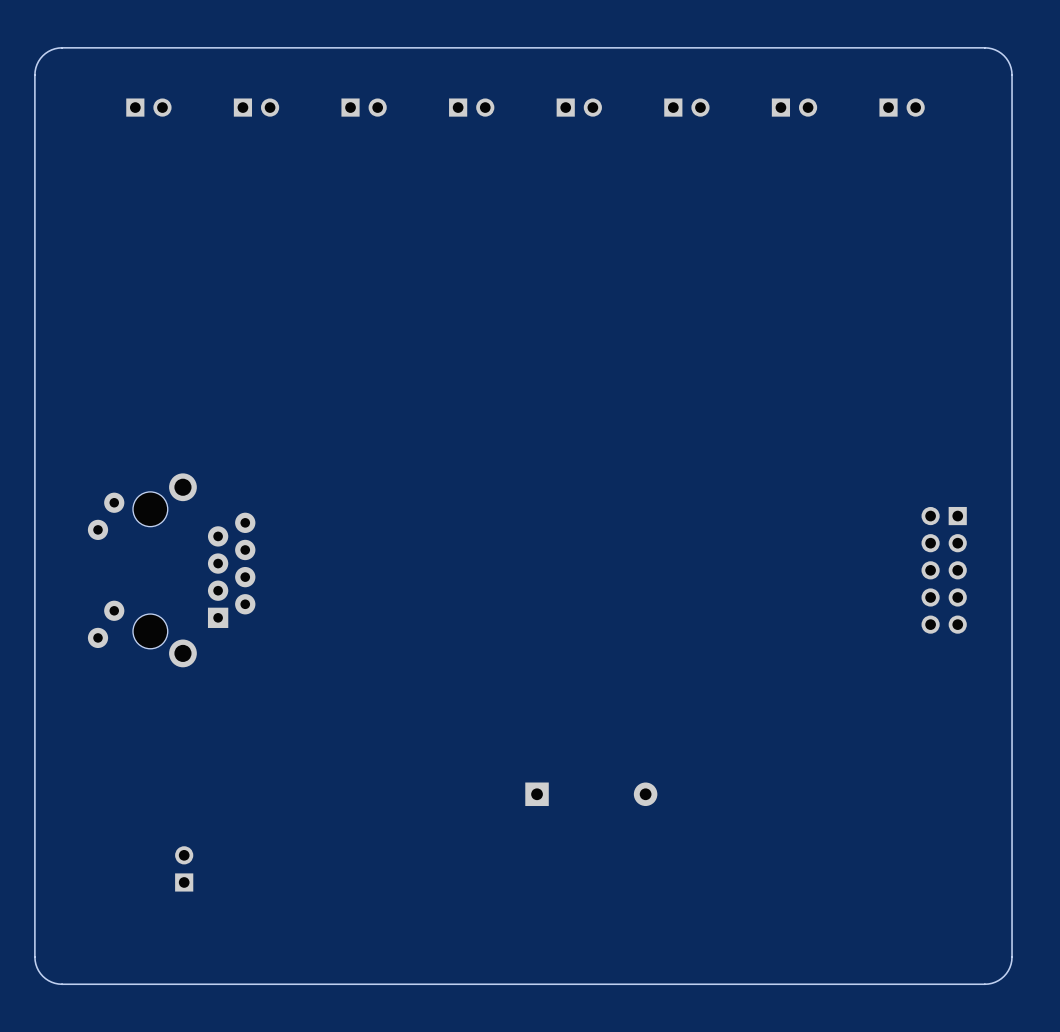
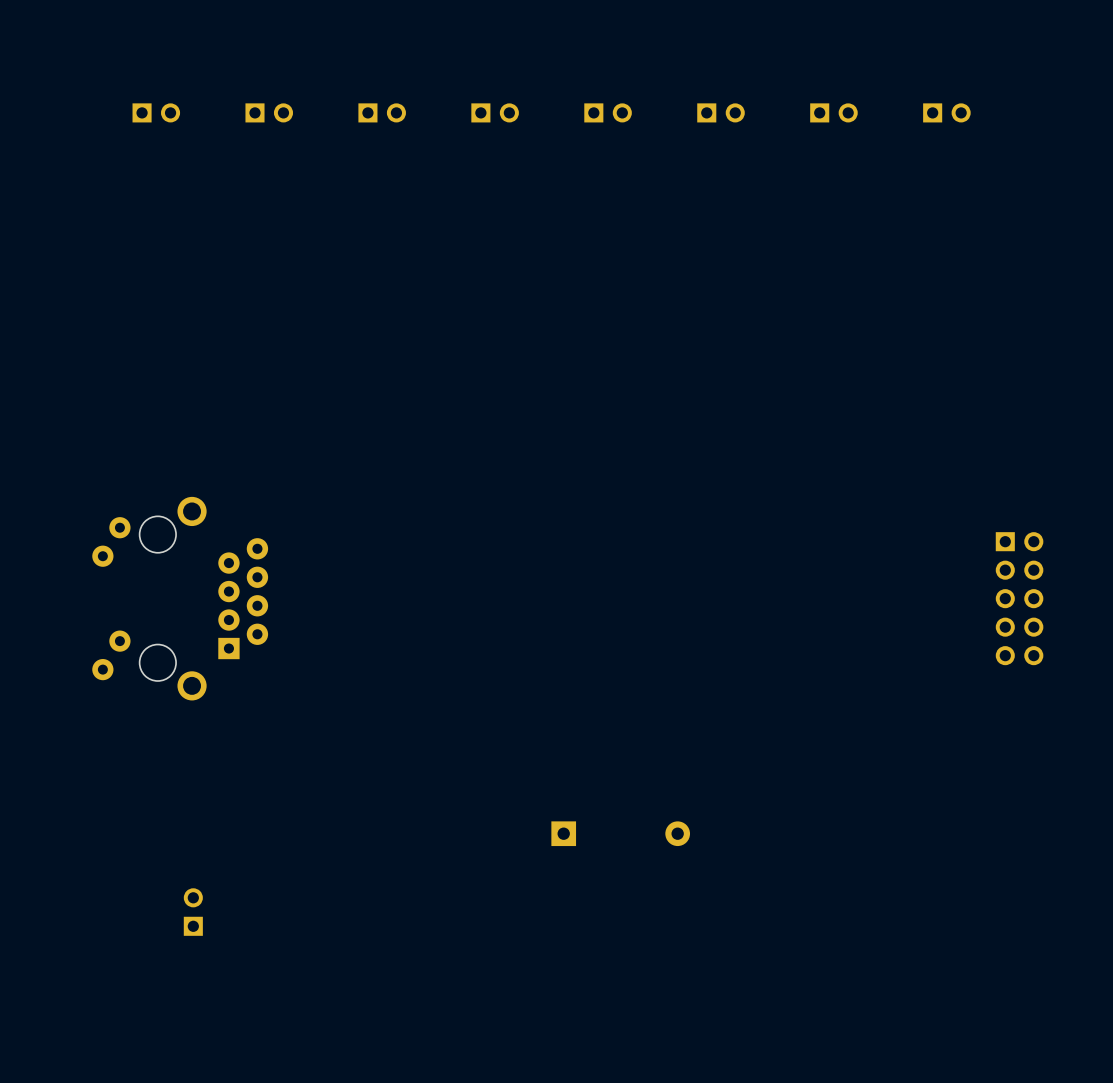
board edge: (984, 47) (62, 47) (51, 49) (42, 55) (36, 64) (34, 74) (34, 957) (36, 967) (42, 976) (51, 982) (62, 984) (984, 984) (995, 982) (1004, 976) (1009, 967) (1012, 957) (1012, 74) (1009, 64) (1004, 55) (995, 49) (984, 47) -> none
part: (944, 570) -> none
part: none -> (1019, 598)

